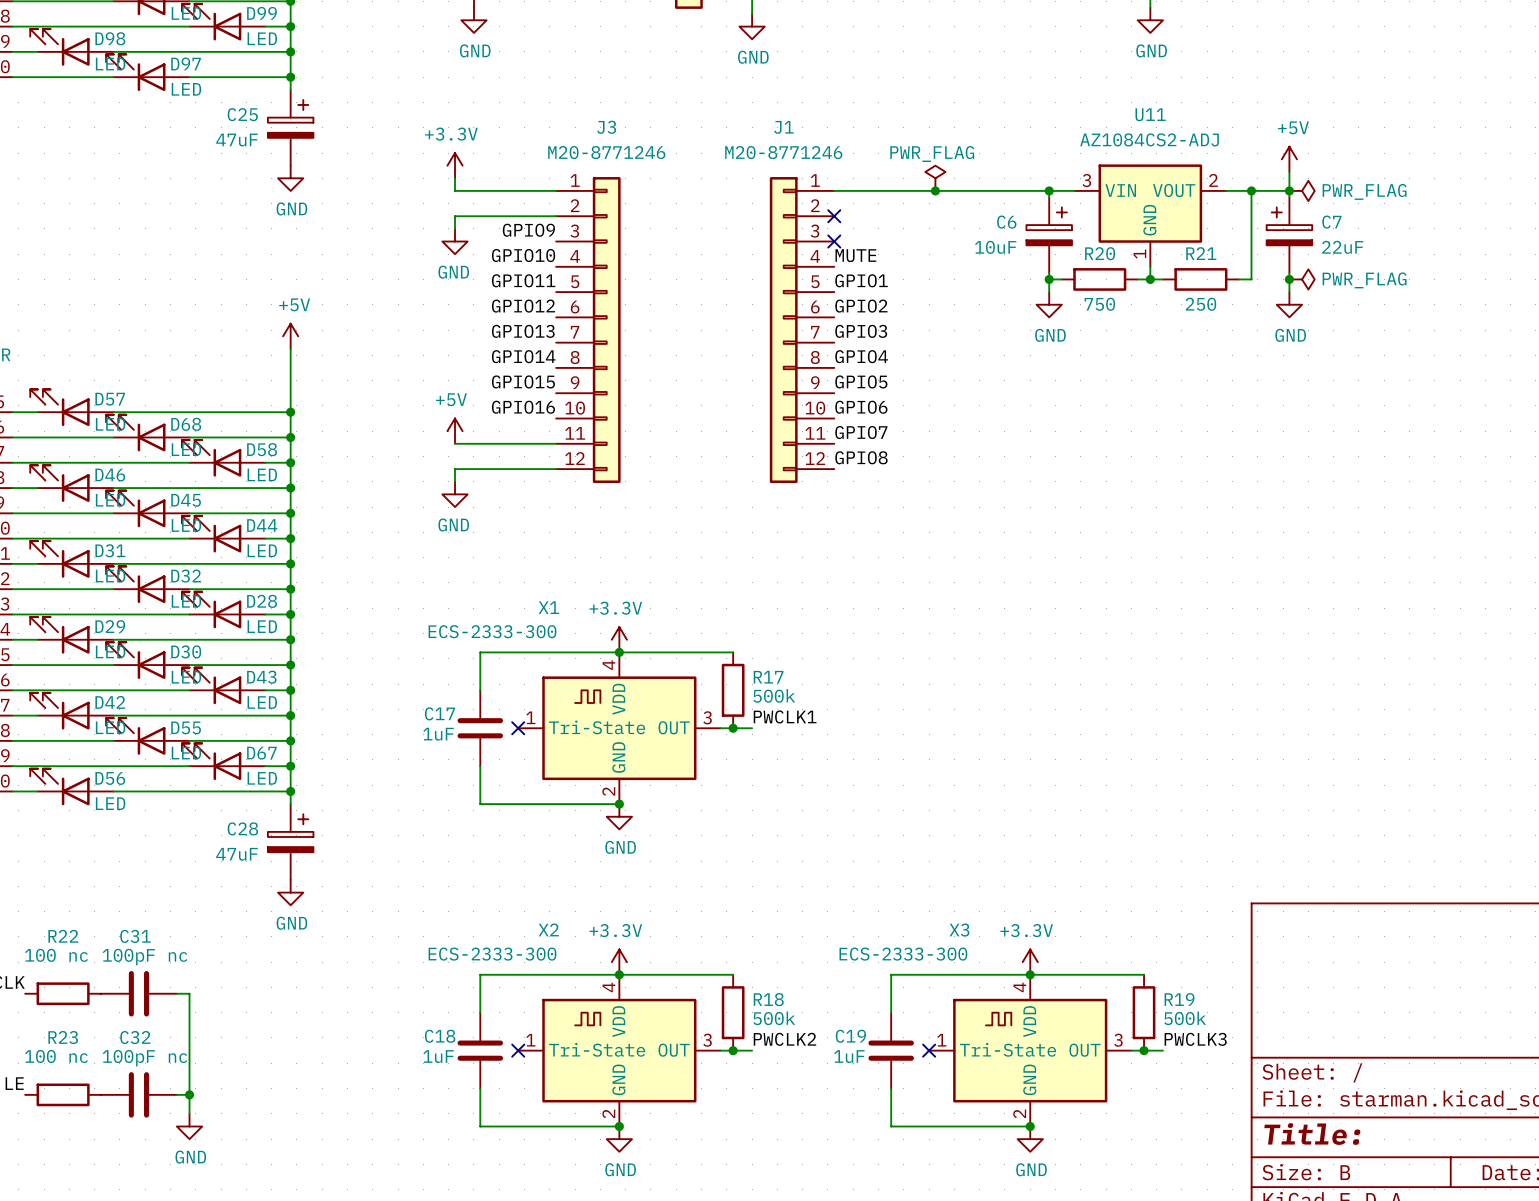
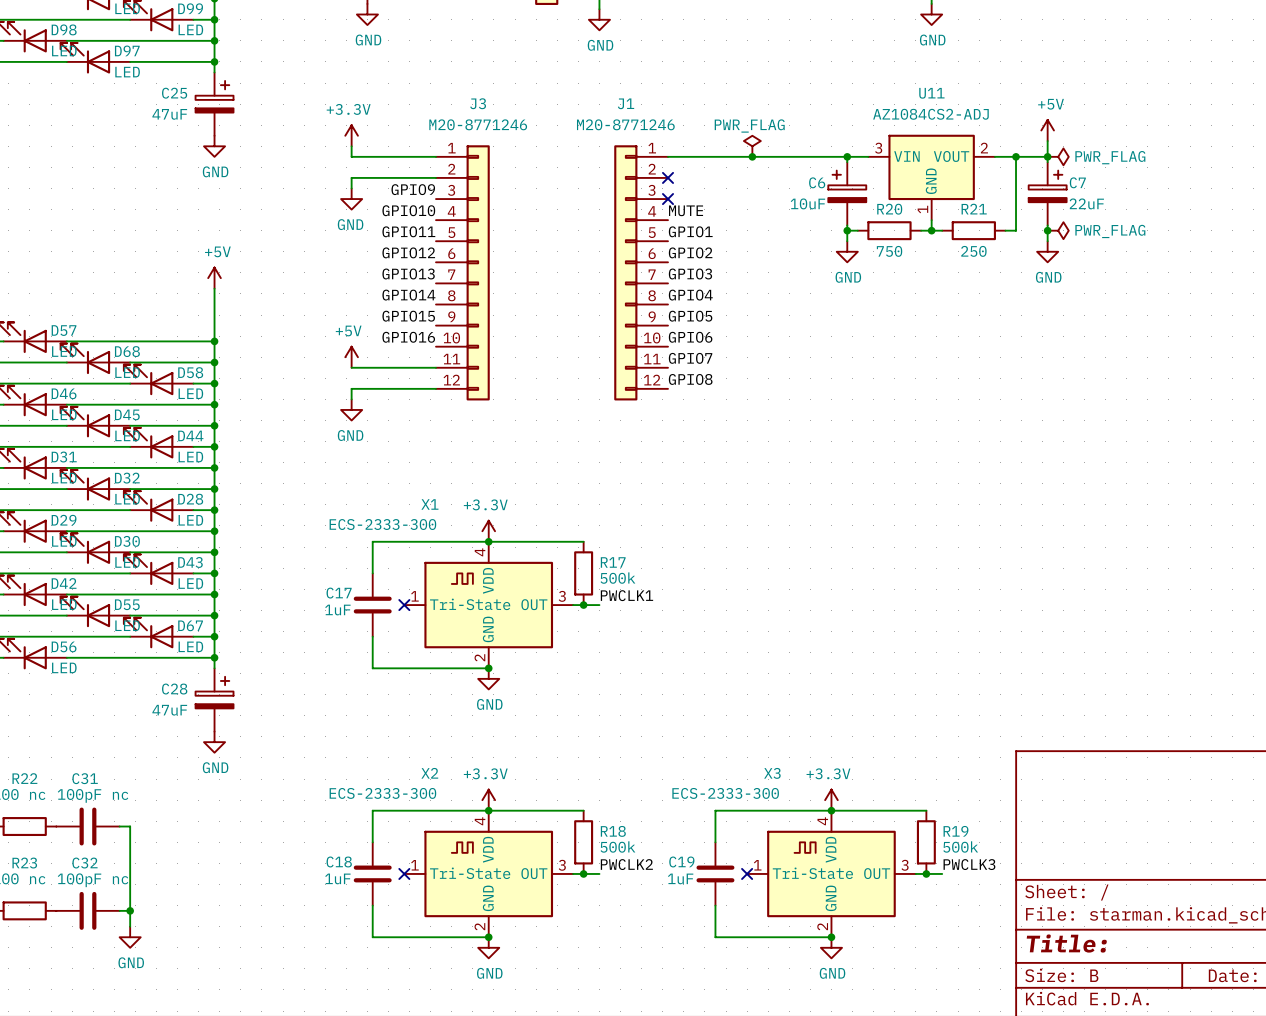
C6 flip: as is (1049, 226) -> left-right (847, 186)
C7 flip: as is (1289, 226) -> left-right (1047, 186)

